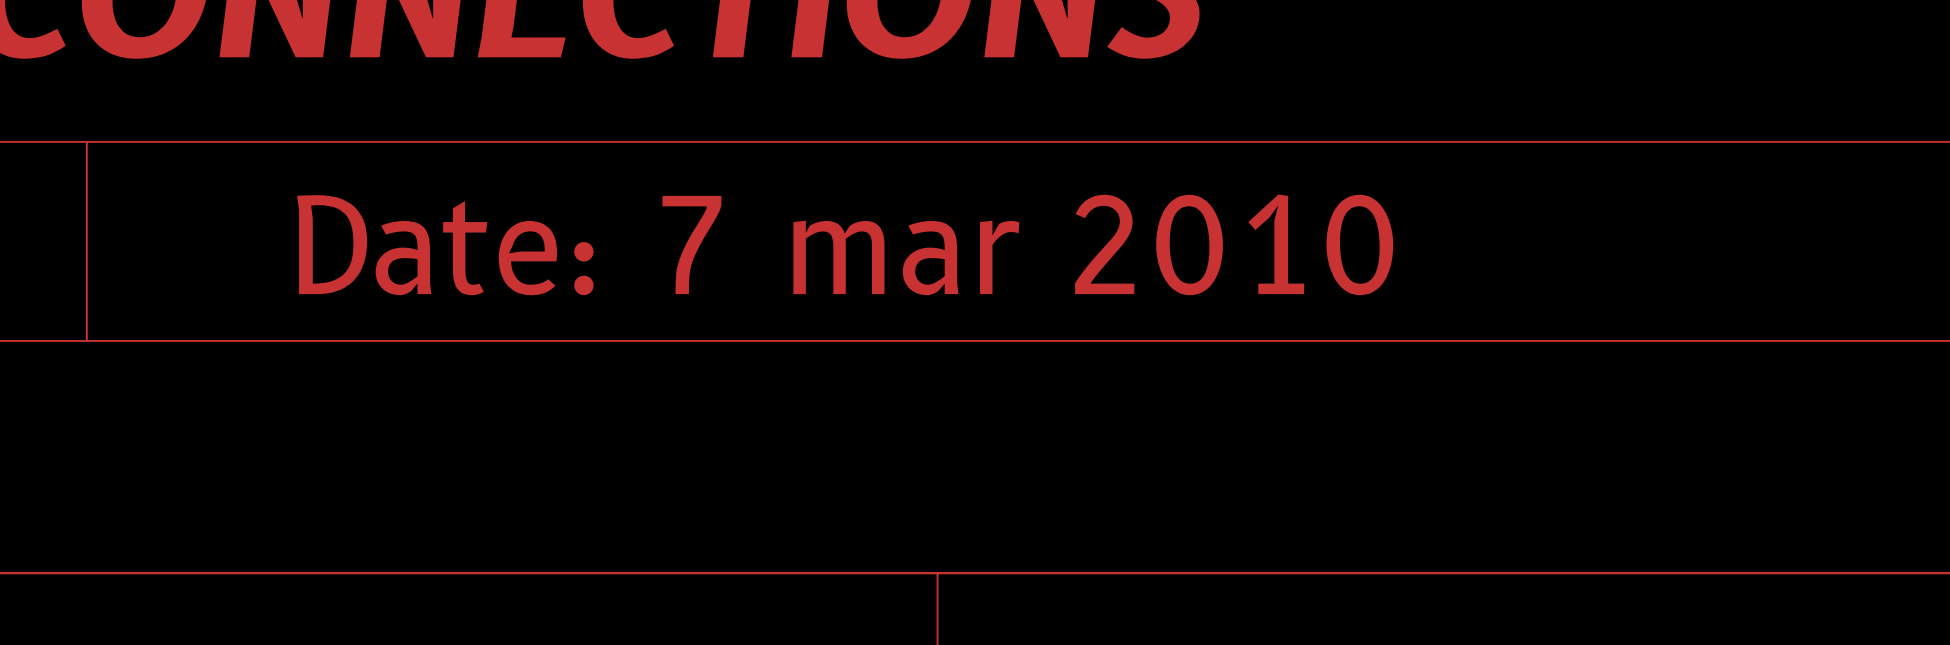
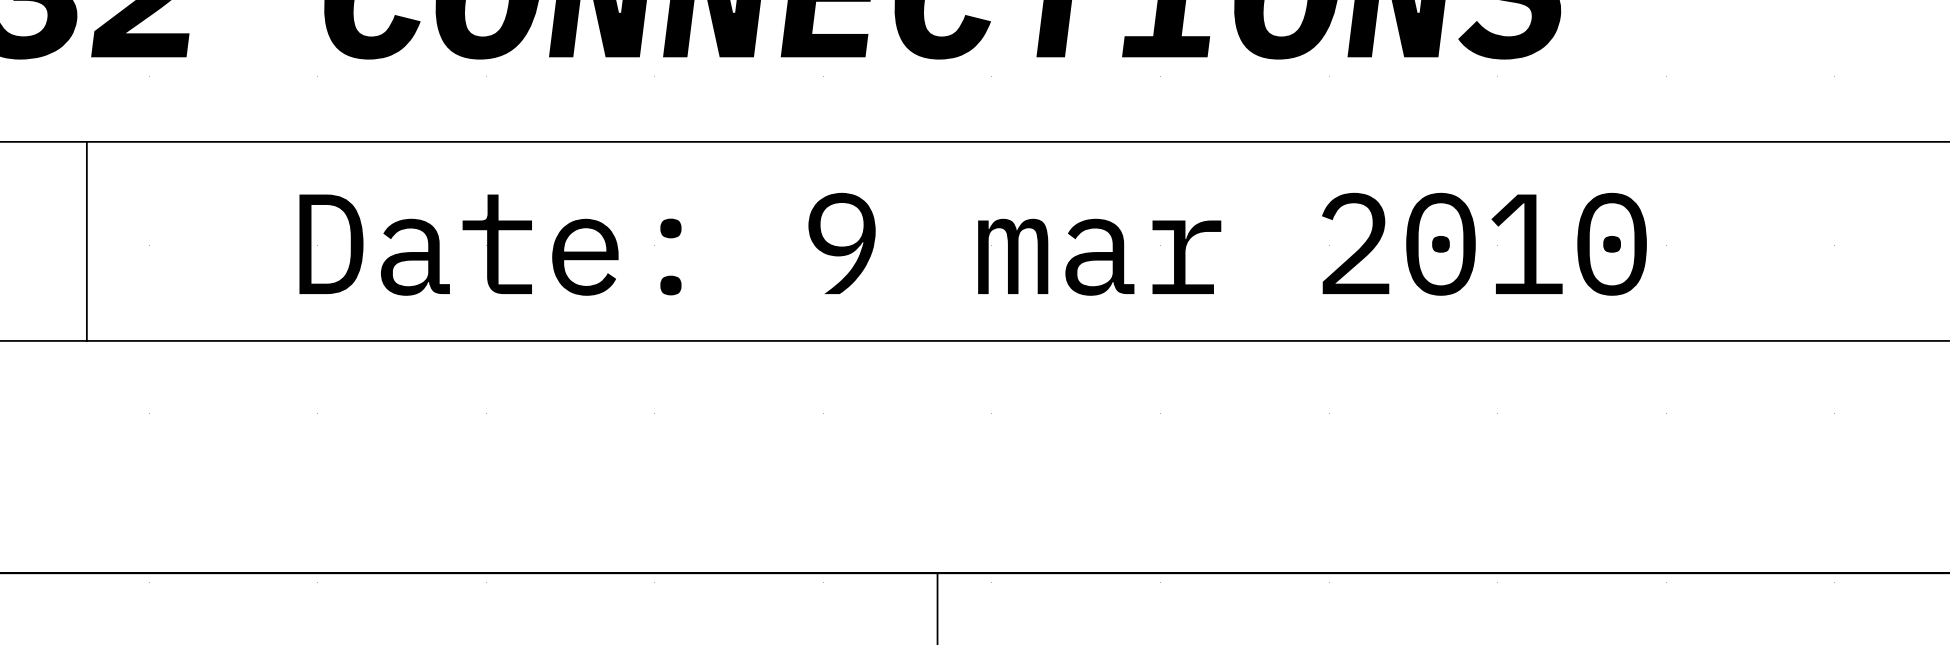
title block: Date: 7 mar 2010 (845, 244) -> Date: 9 mar 2010 (973, 244)

